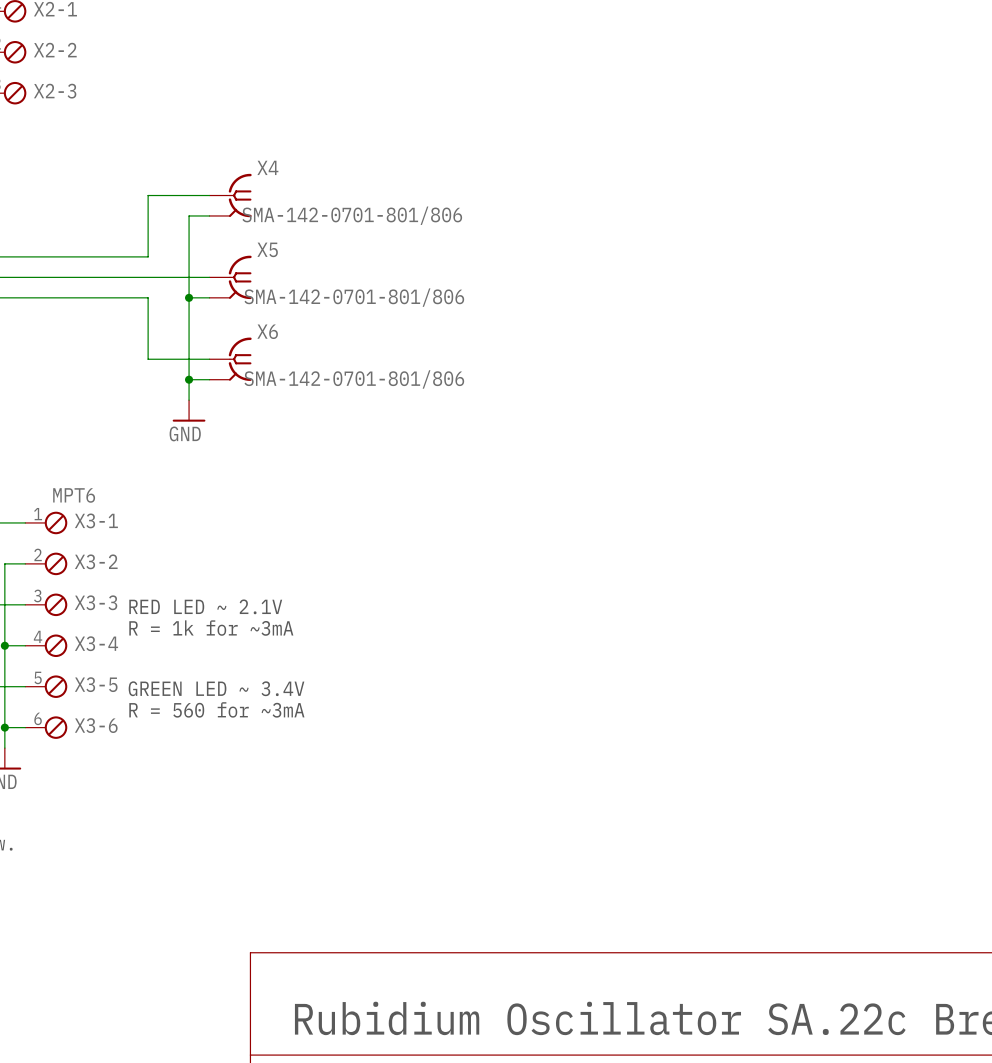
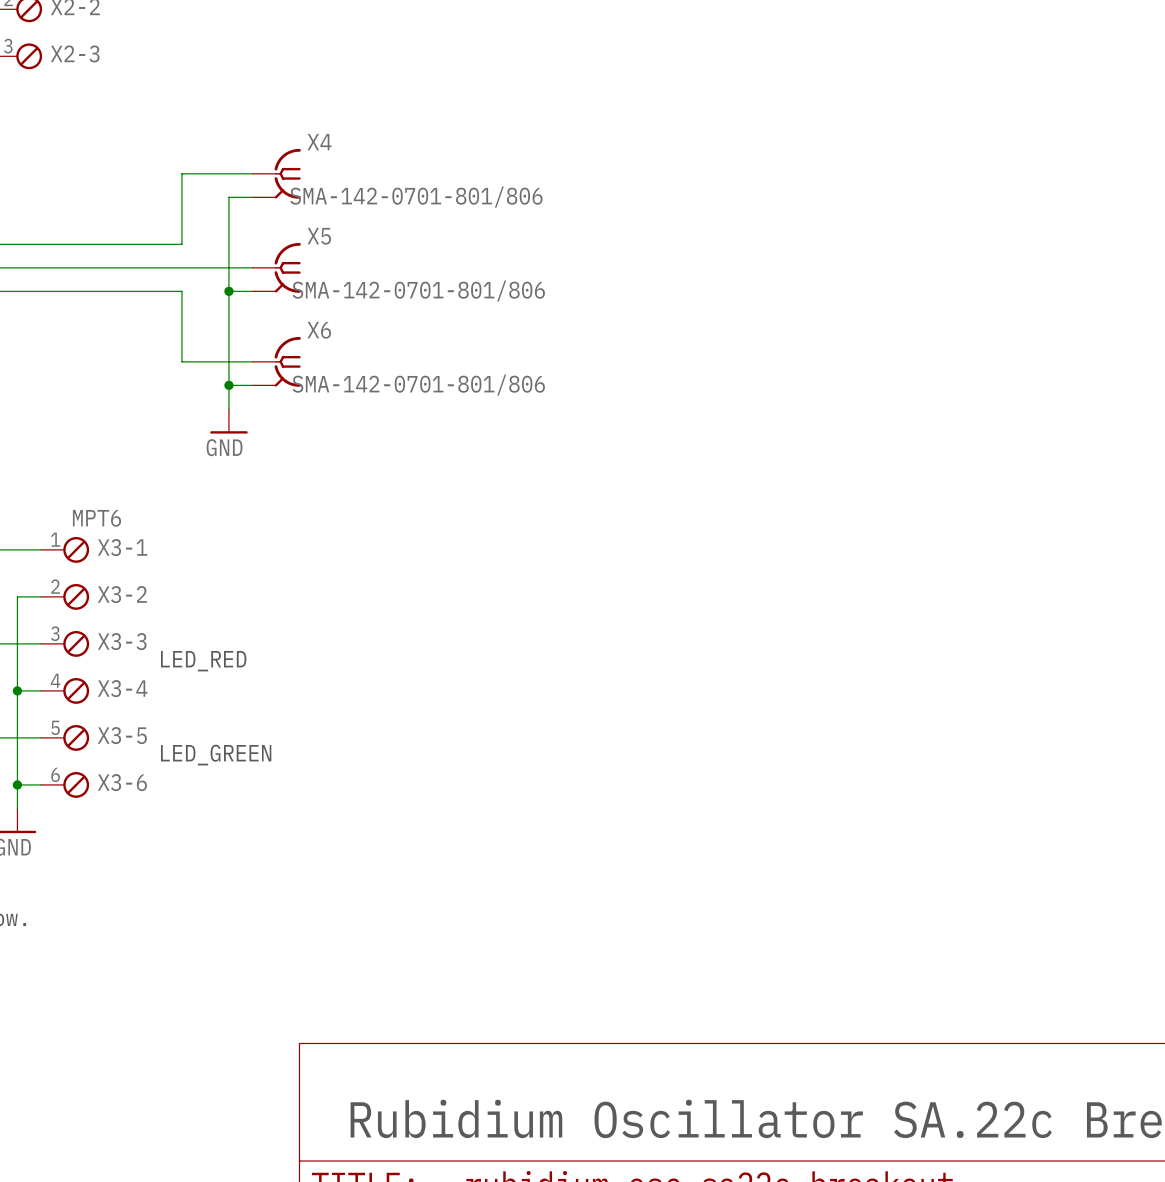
text: RED LED ~ 2.1V (205, 606) -> none
text: none -> LED_RED (203, 661)
text: R = 1k for ~3mA (211, 628) -> none
text: GREEN LED ~ 3.4V (216, 688) -> none
text: none -> LED_GREEN (216, 755)
text: R = 560 for ~3mA (216, 709) -> none

